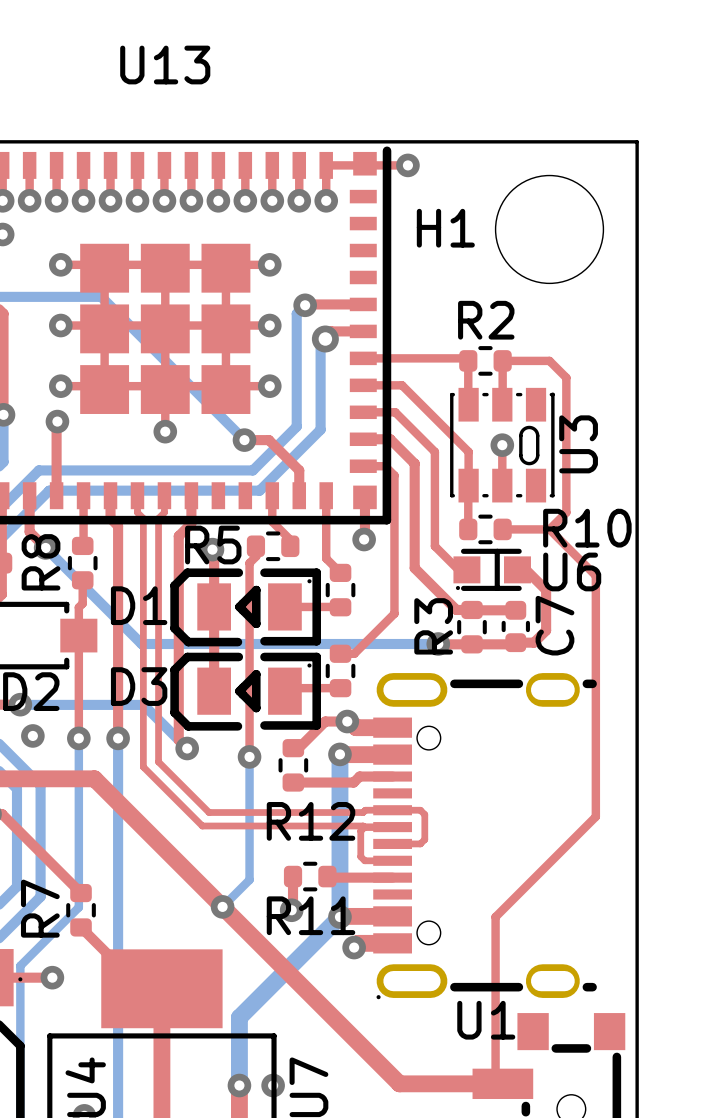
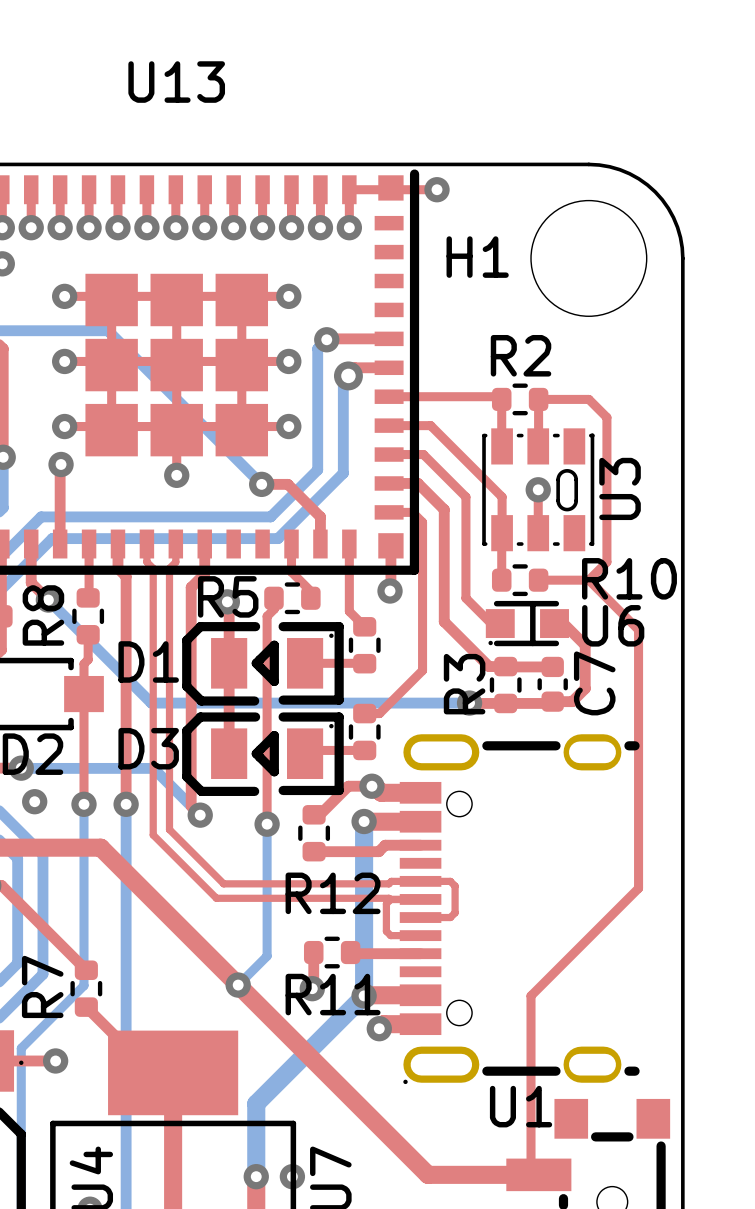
board edge: (549, 141) (637, 141) (637, 229) -> (588, 164) (619, 169) (638, 178) (655, 191) (668, 208) (677, 227) (682, 258)

